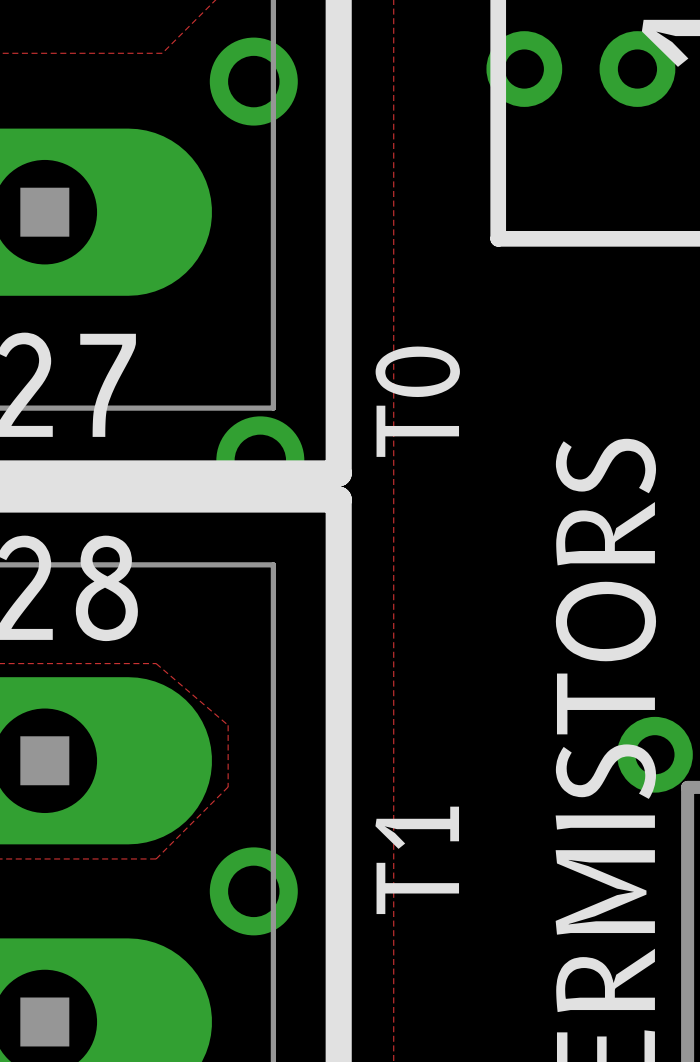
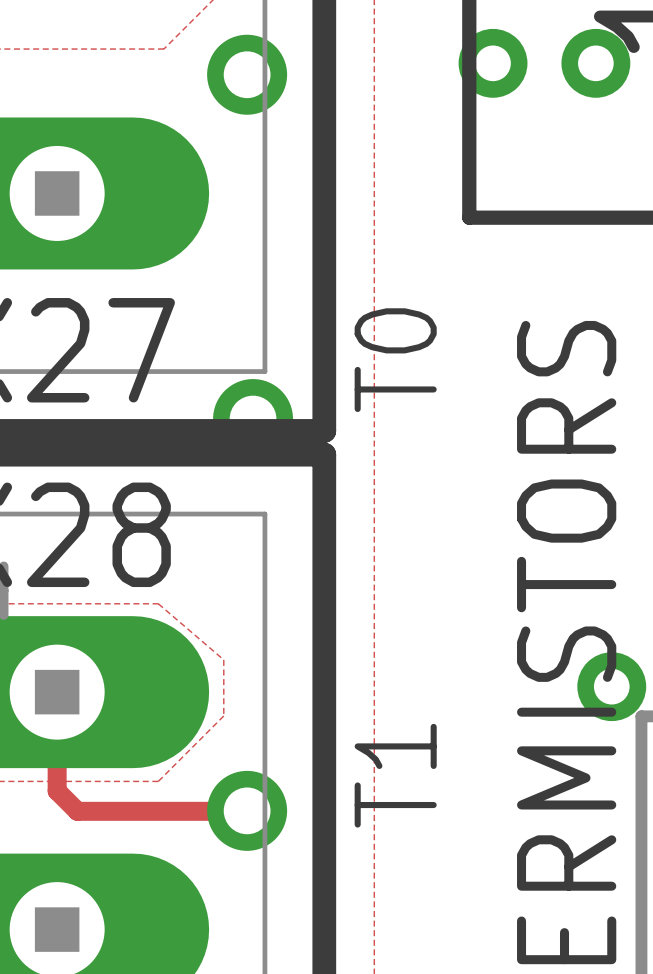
track: none -> (57, 692) (57, 791) (77, 811) (246, 811)

